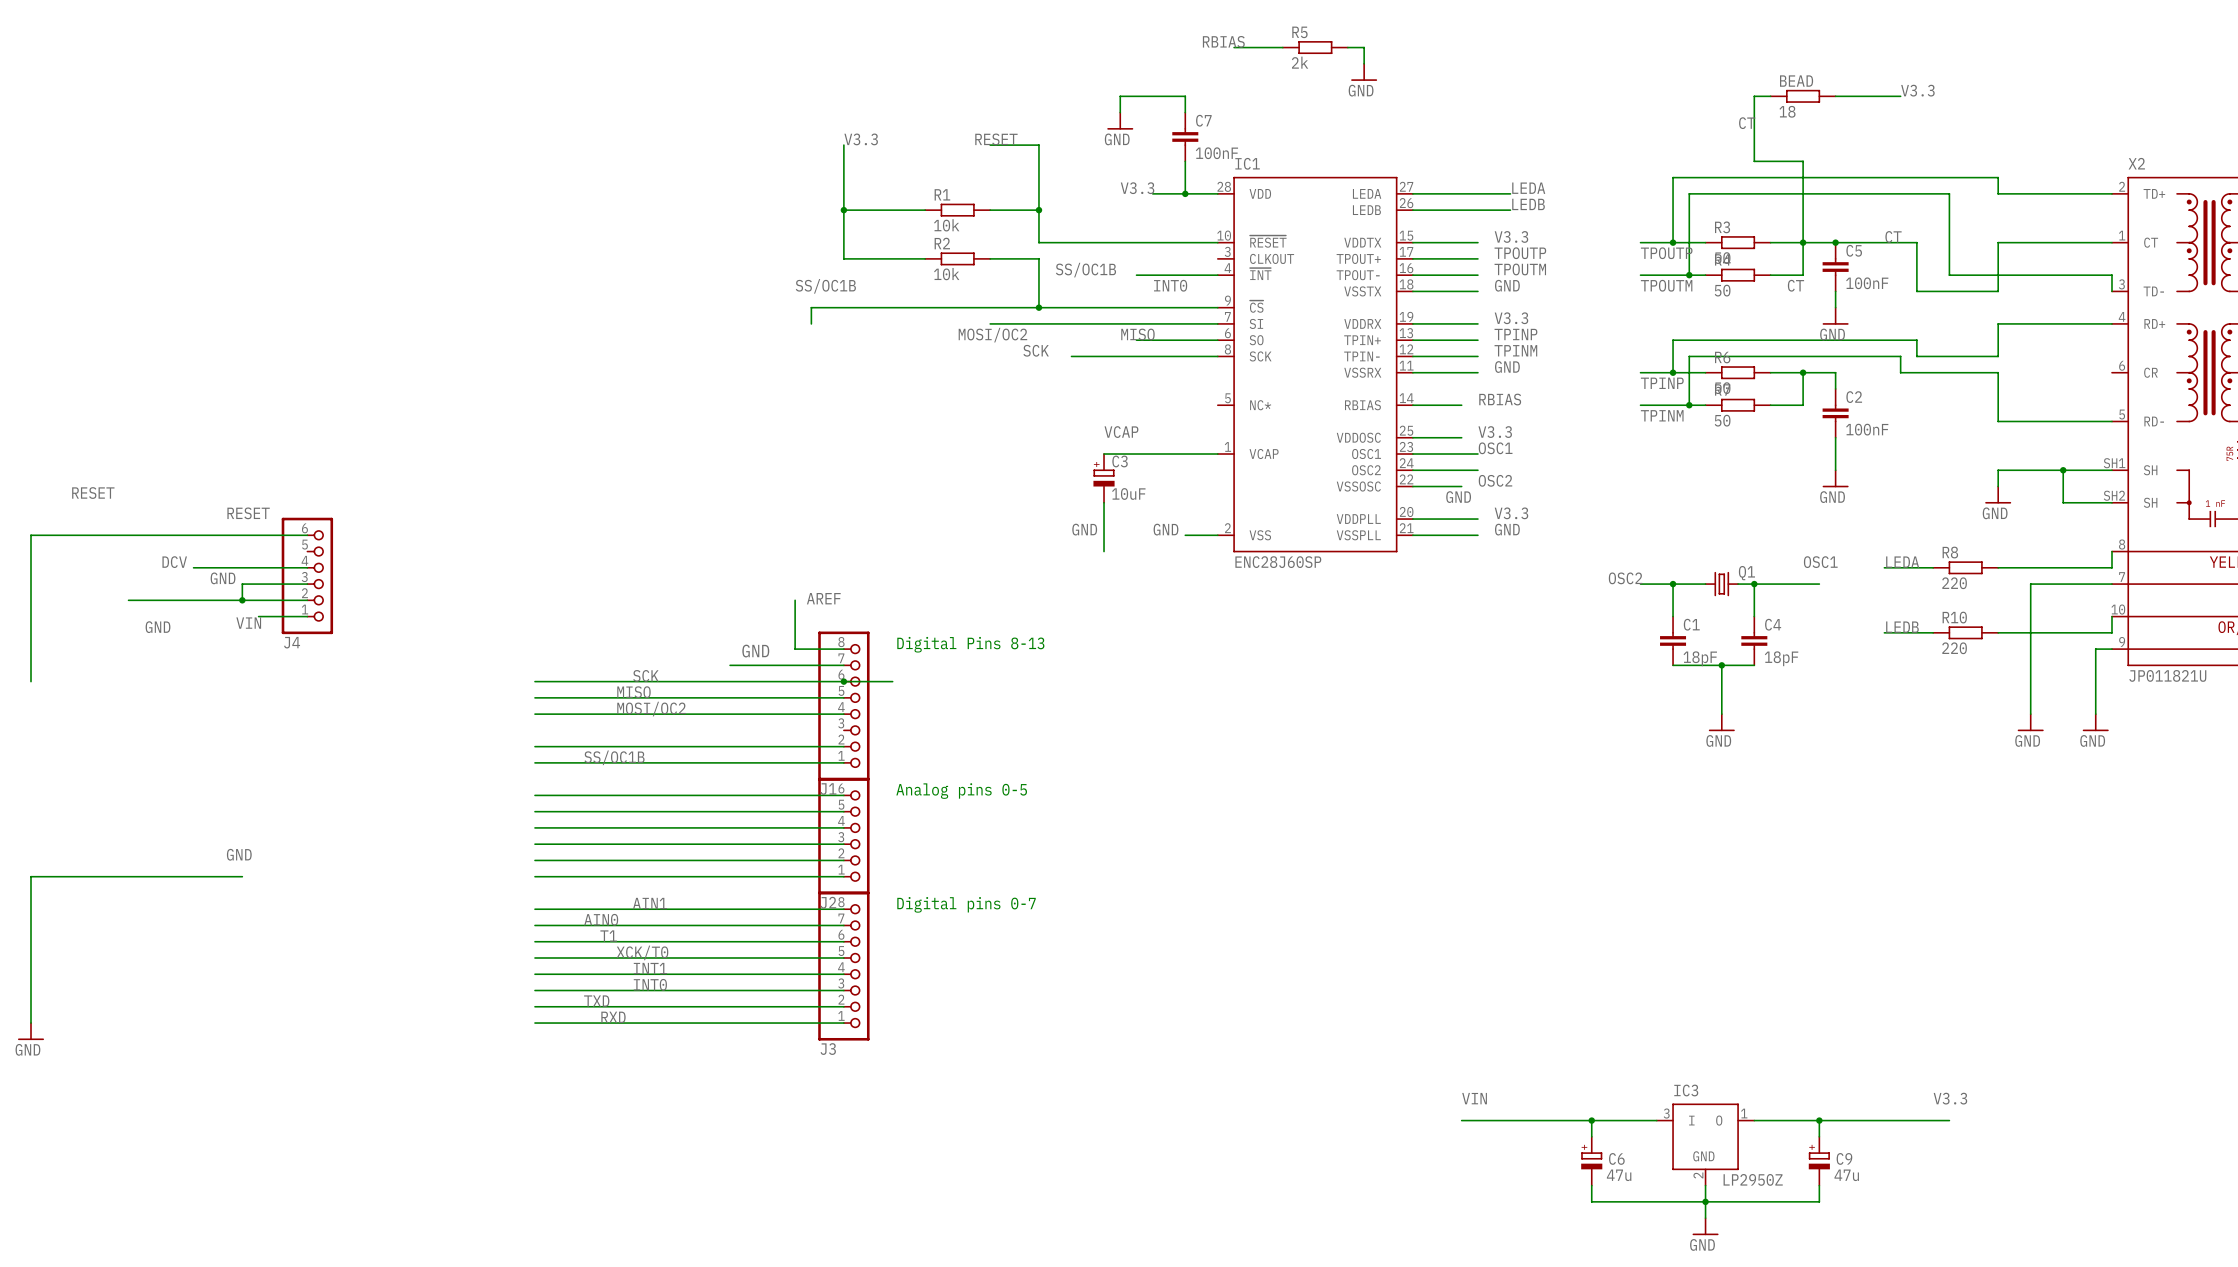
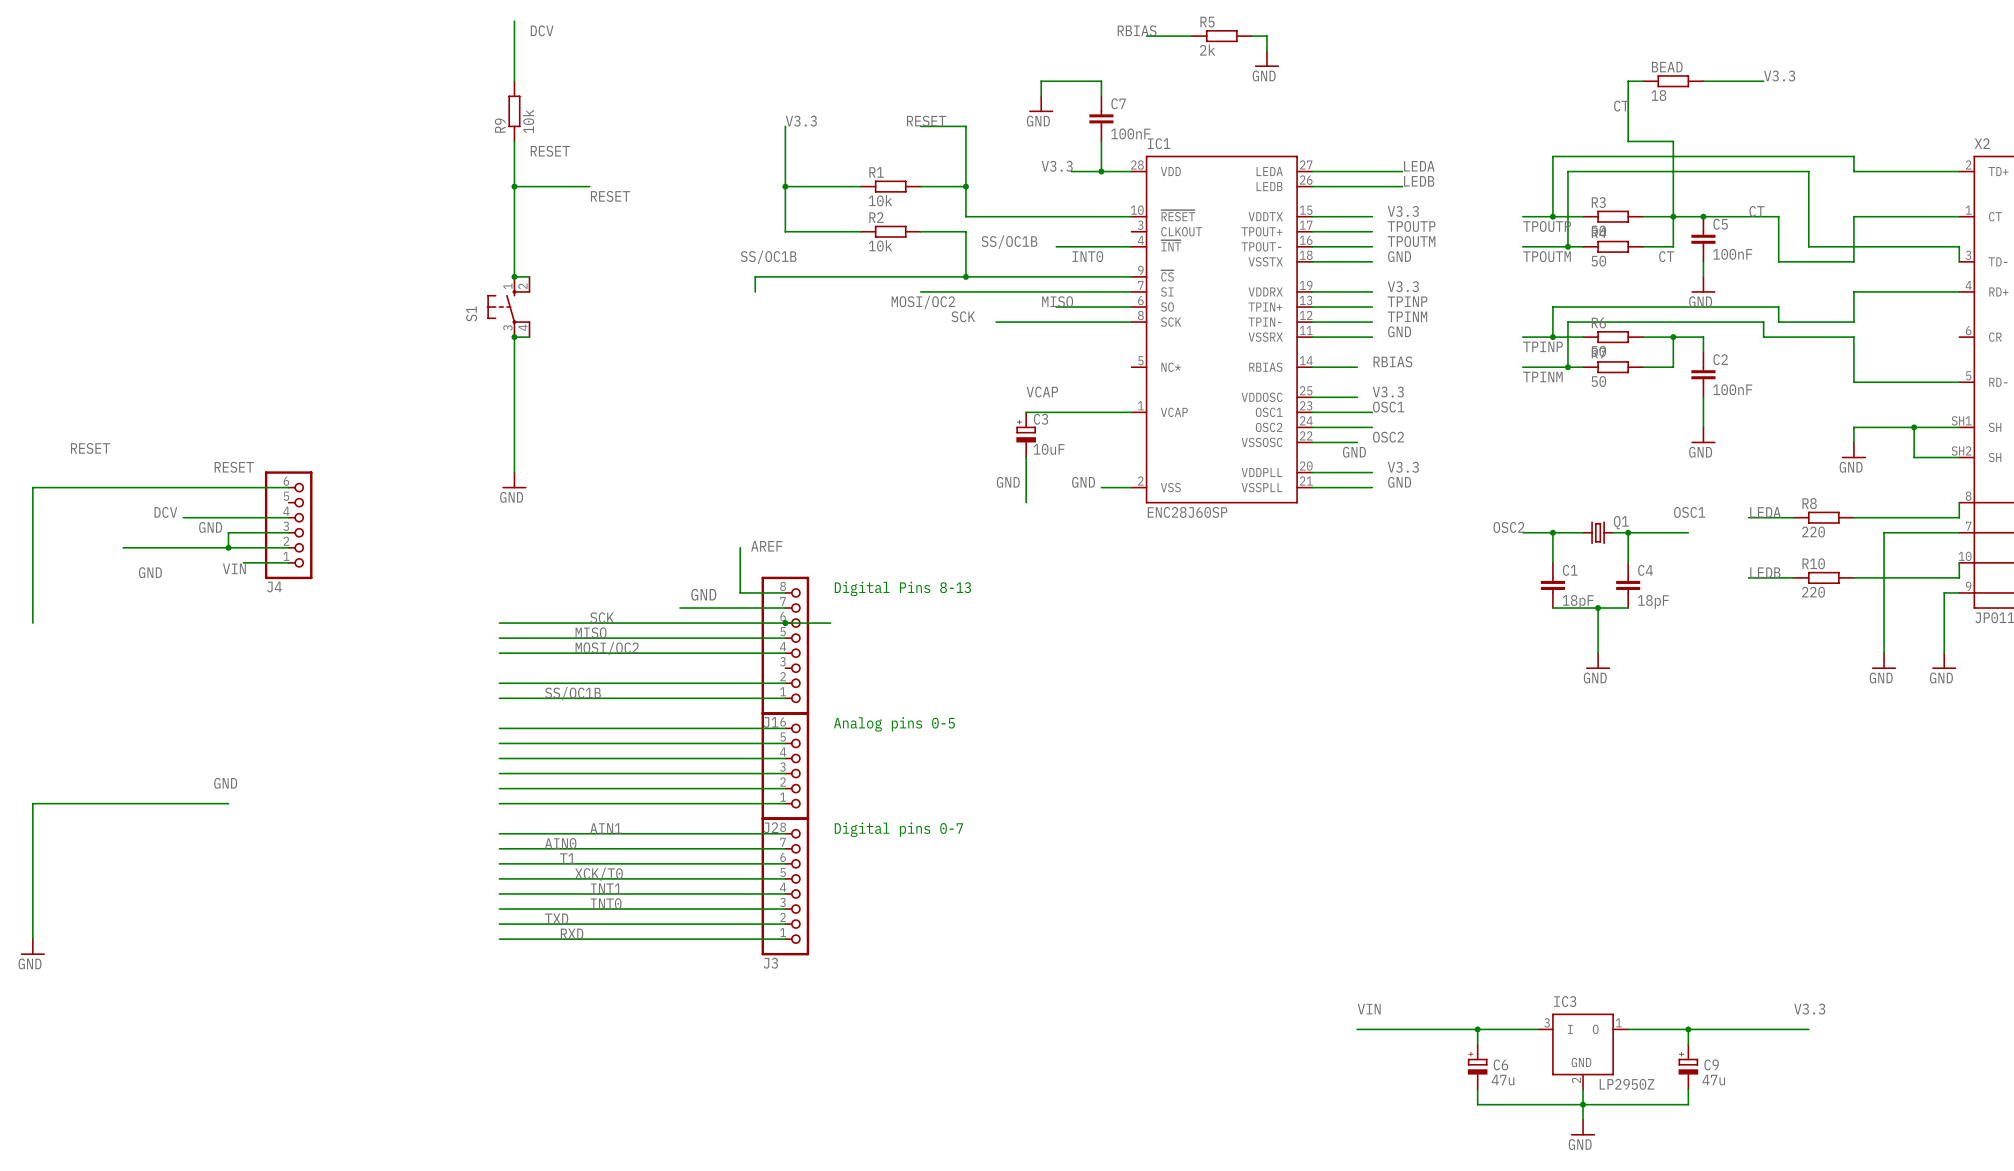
wire: none -> (514, 21) (514, 81)
label: none -> DCV (542, 30)
R9: none -> 10k (514, 111)
wire: none -> (514, 141) (514, 276) (529, 276)
label: none -> RESET (550, 151)
wire: none -> (514, 186) (589, 186)
junction: none -> (514, 186)
label: none -> RESET (610, 196)
junction: none -> (514, 276)
S1: none -> (508, 307)
junction: none -> (514, 337)
wire: none -> (529, 337) (514, 337) (514, 472)
power symbol: none -> GND (514, 480)

